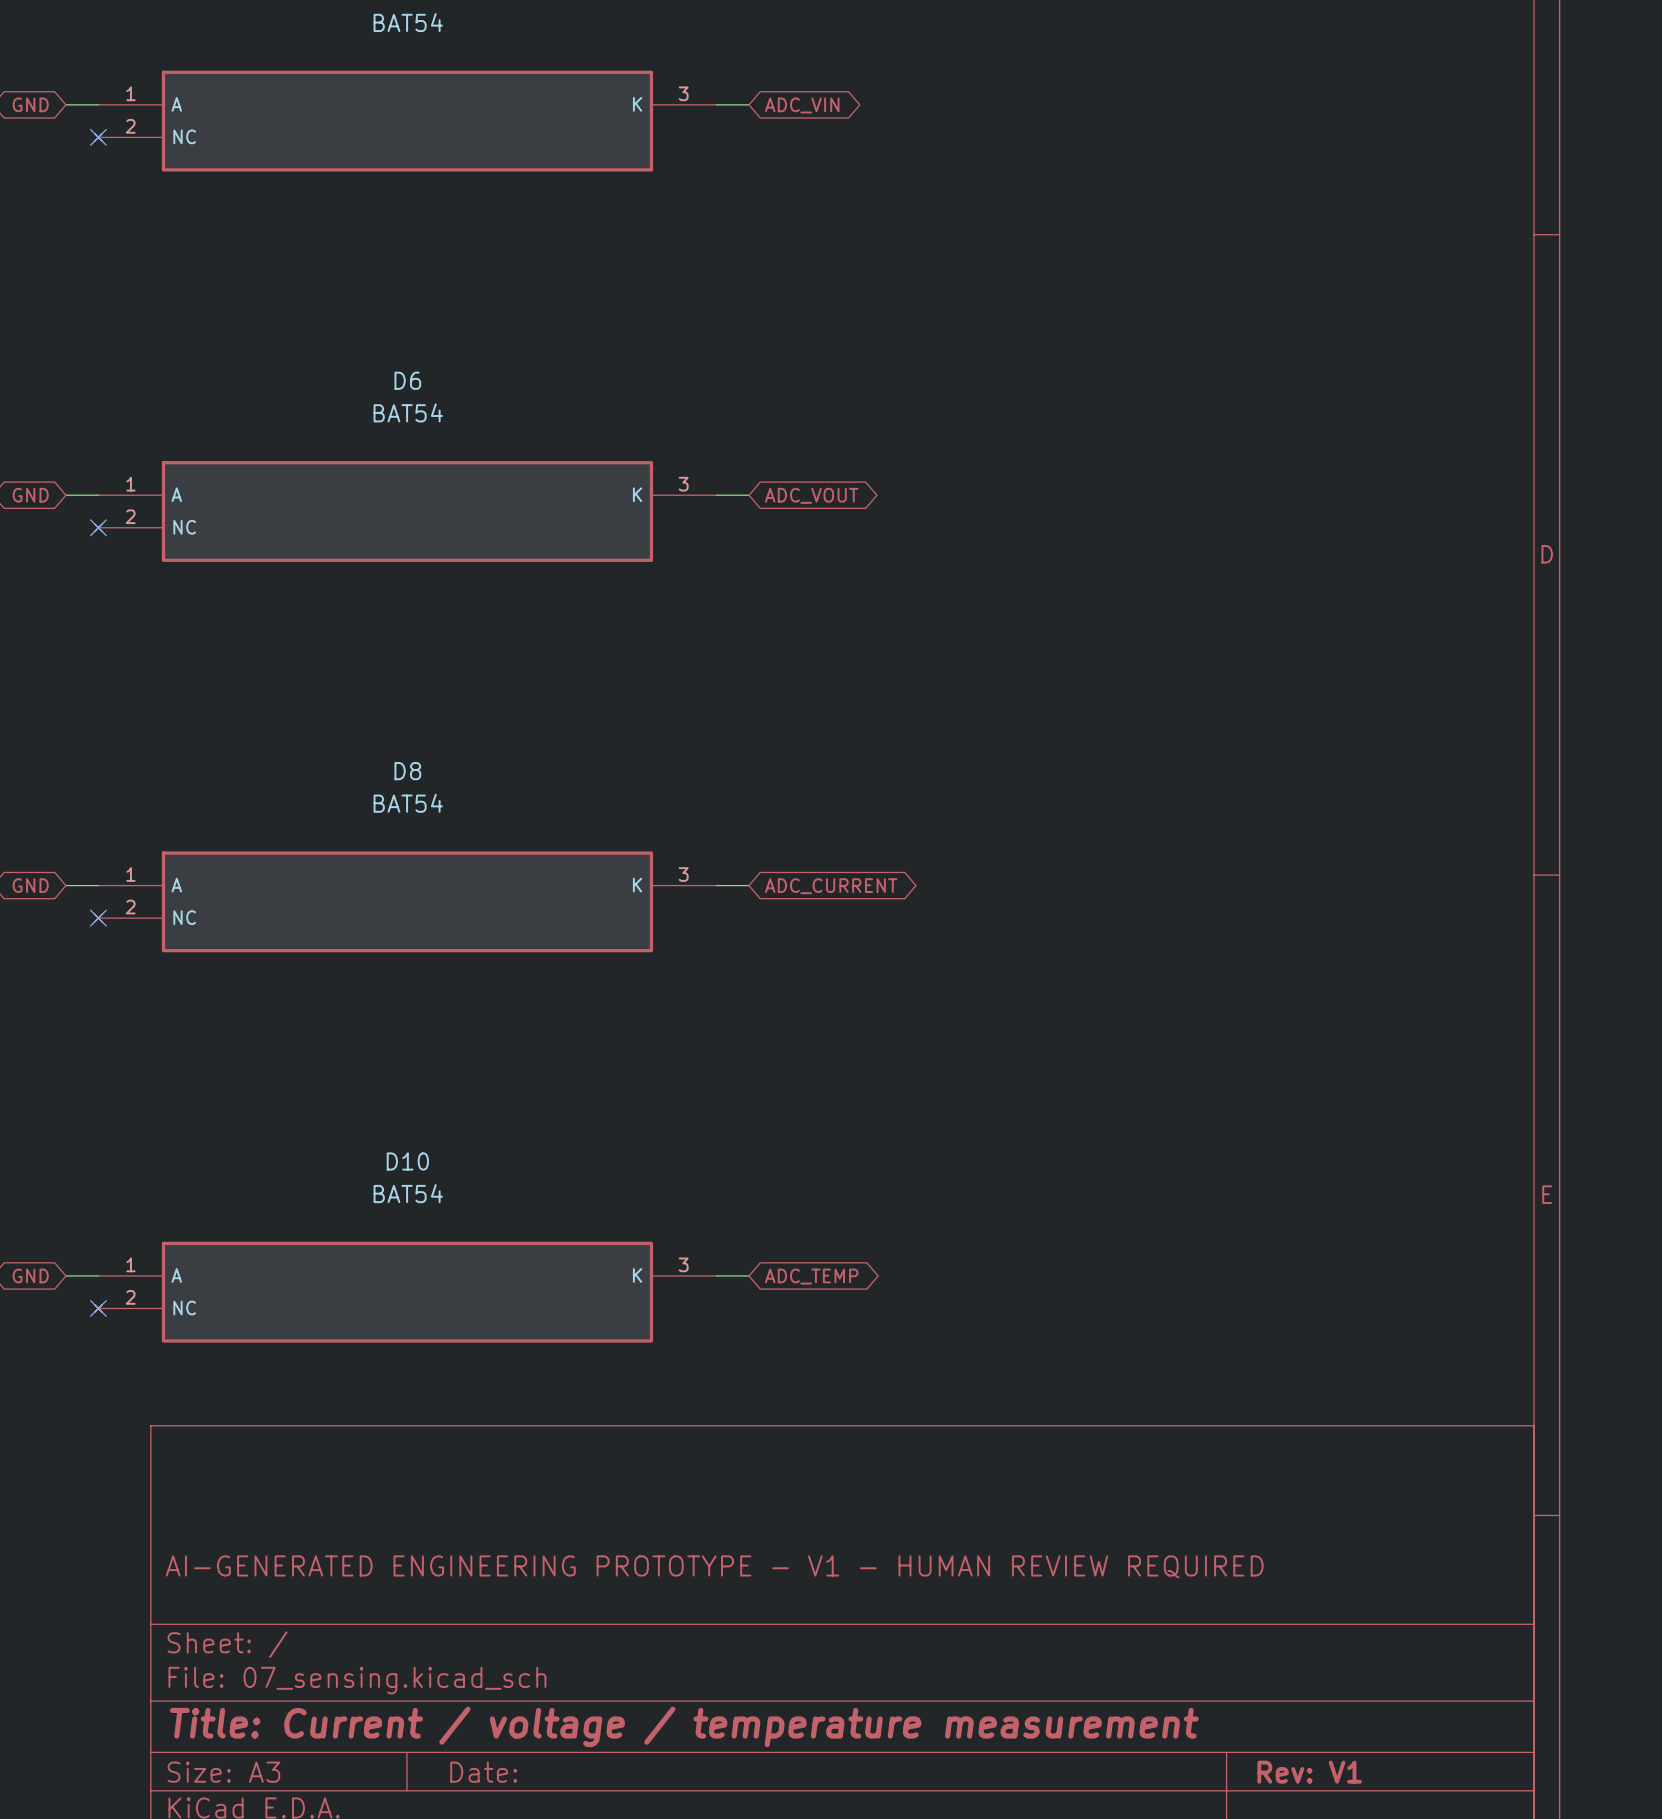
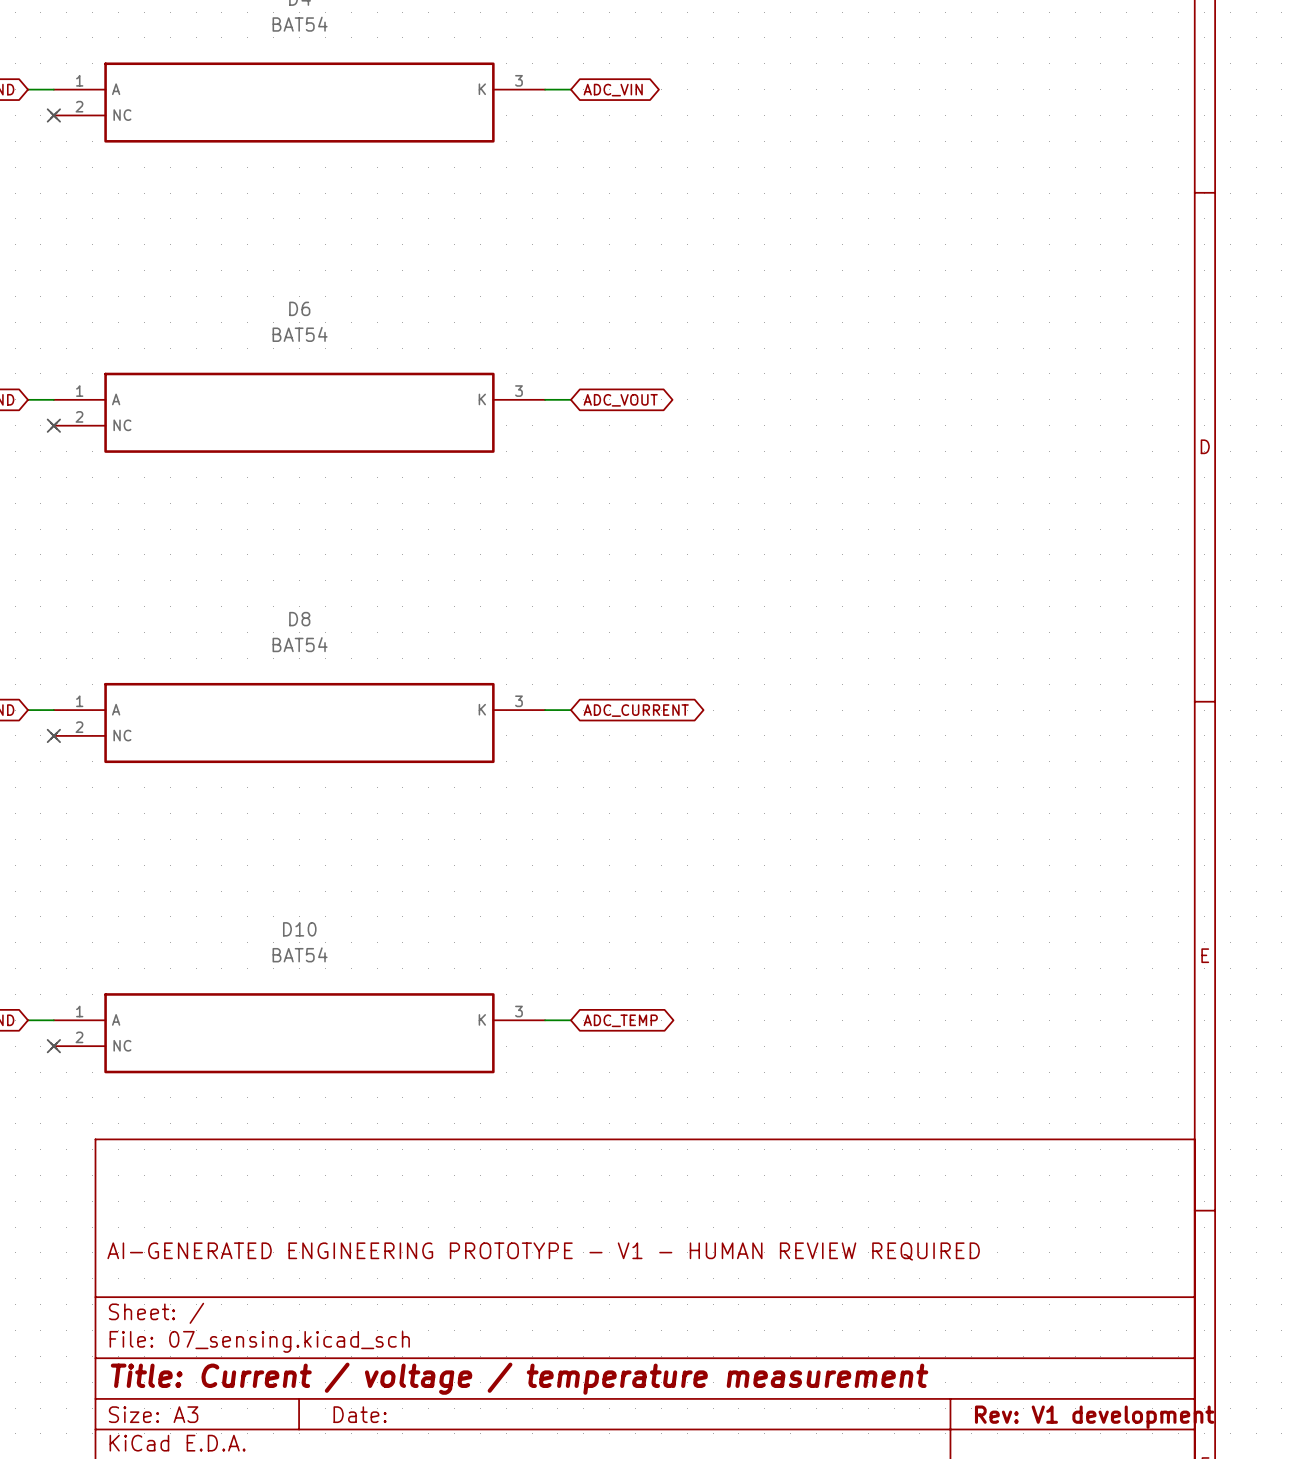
title block: Rev: V1 (1309, 1772) -> Rev: V1 development (1094, 1417)

